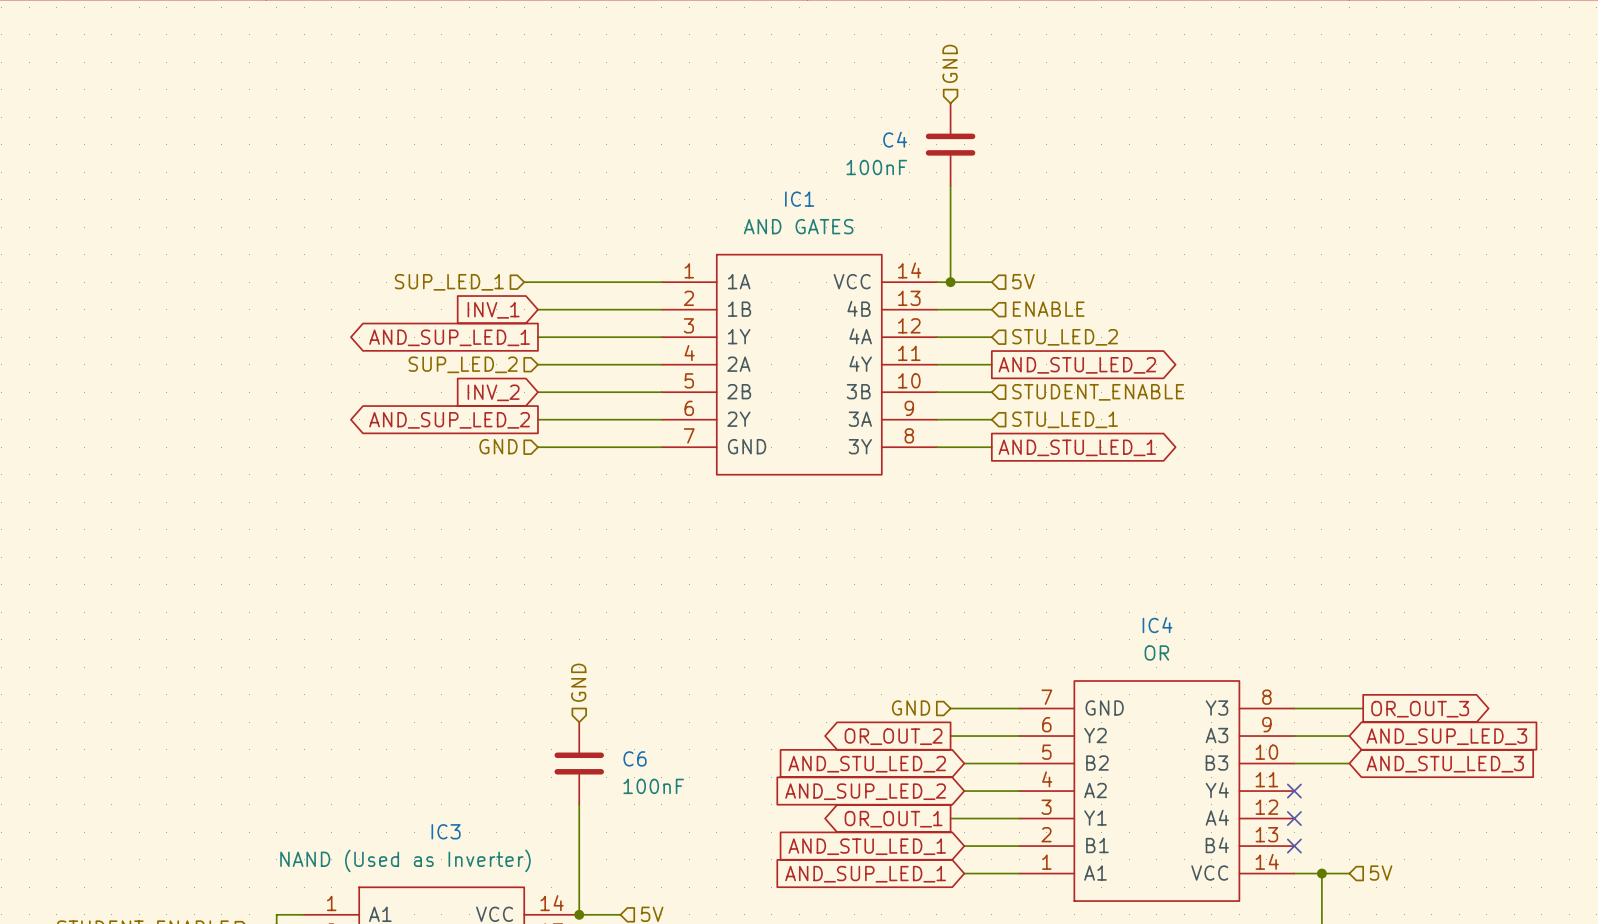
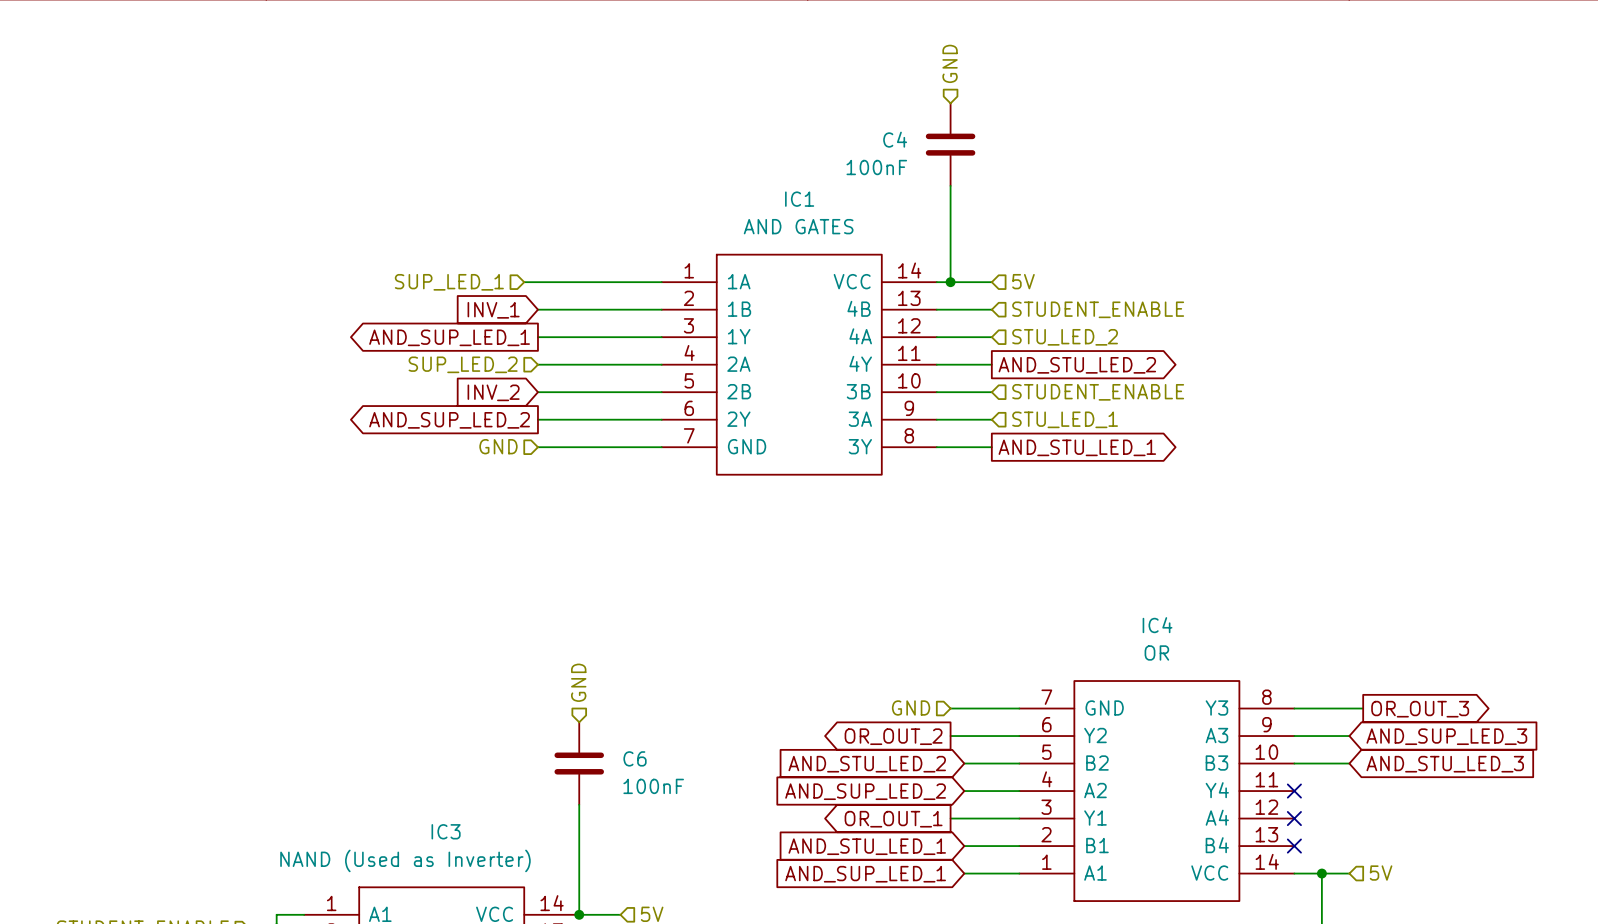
hierarchical label: ENABLE (1048, 309) -> STUDENT_ENABLE (1098, 309)

